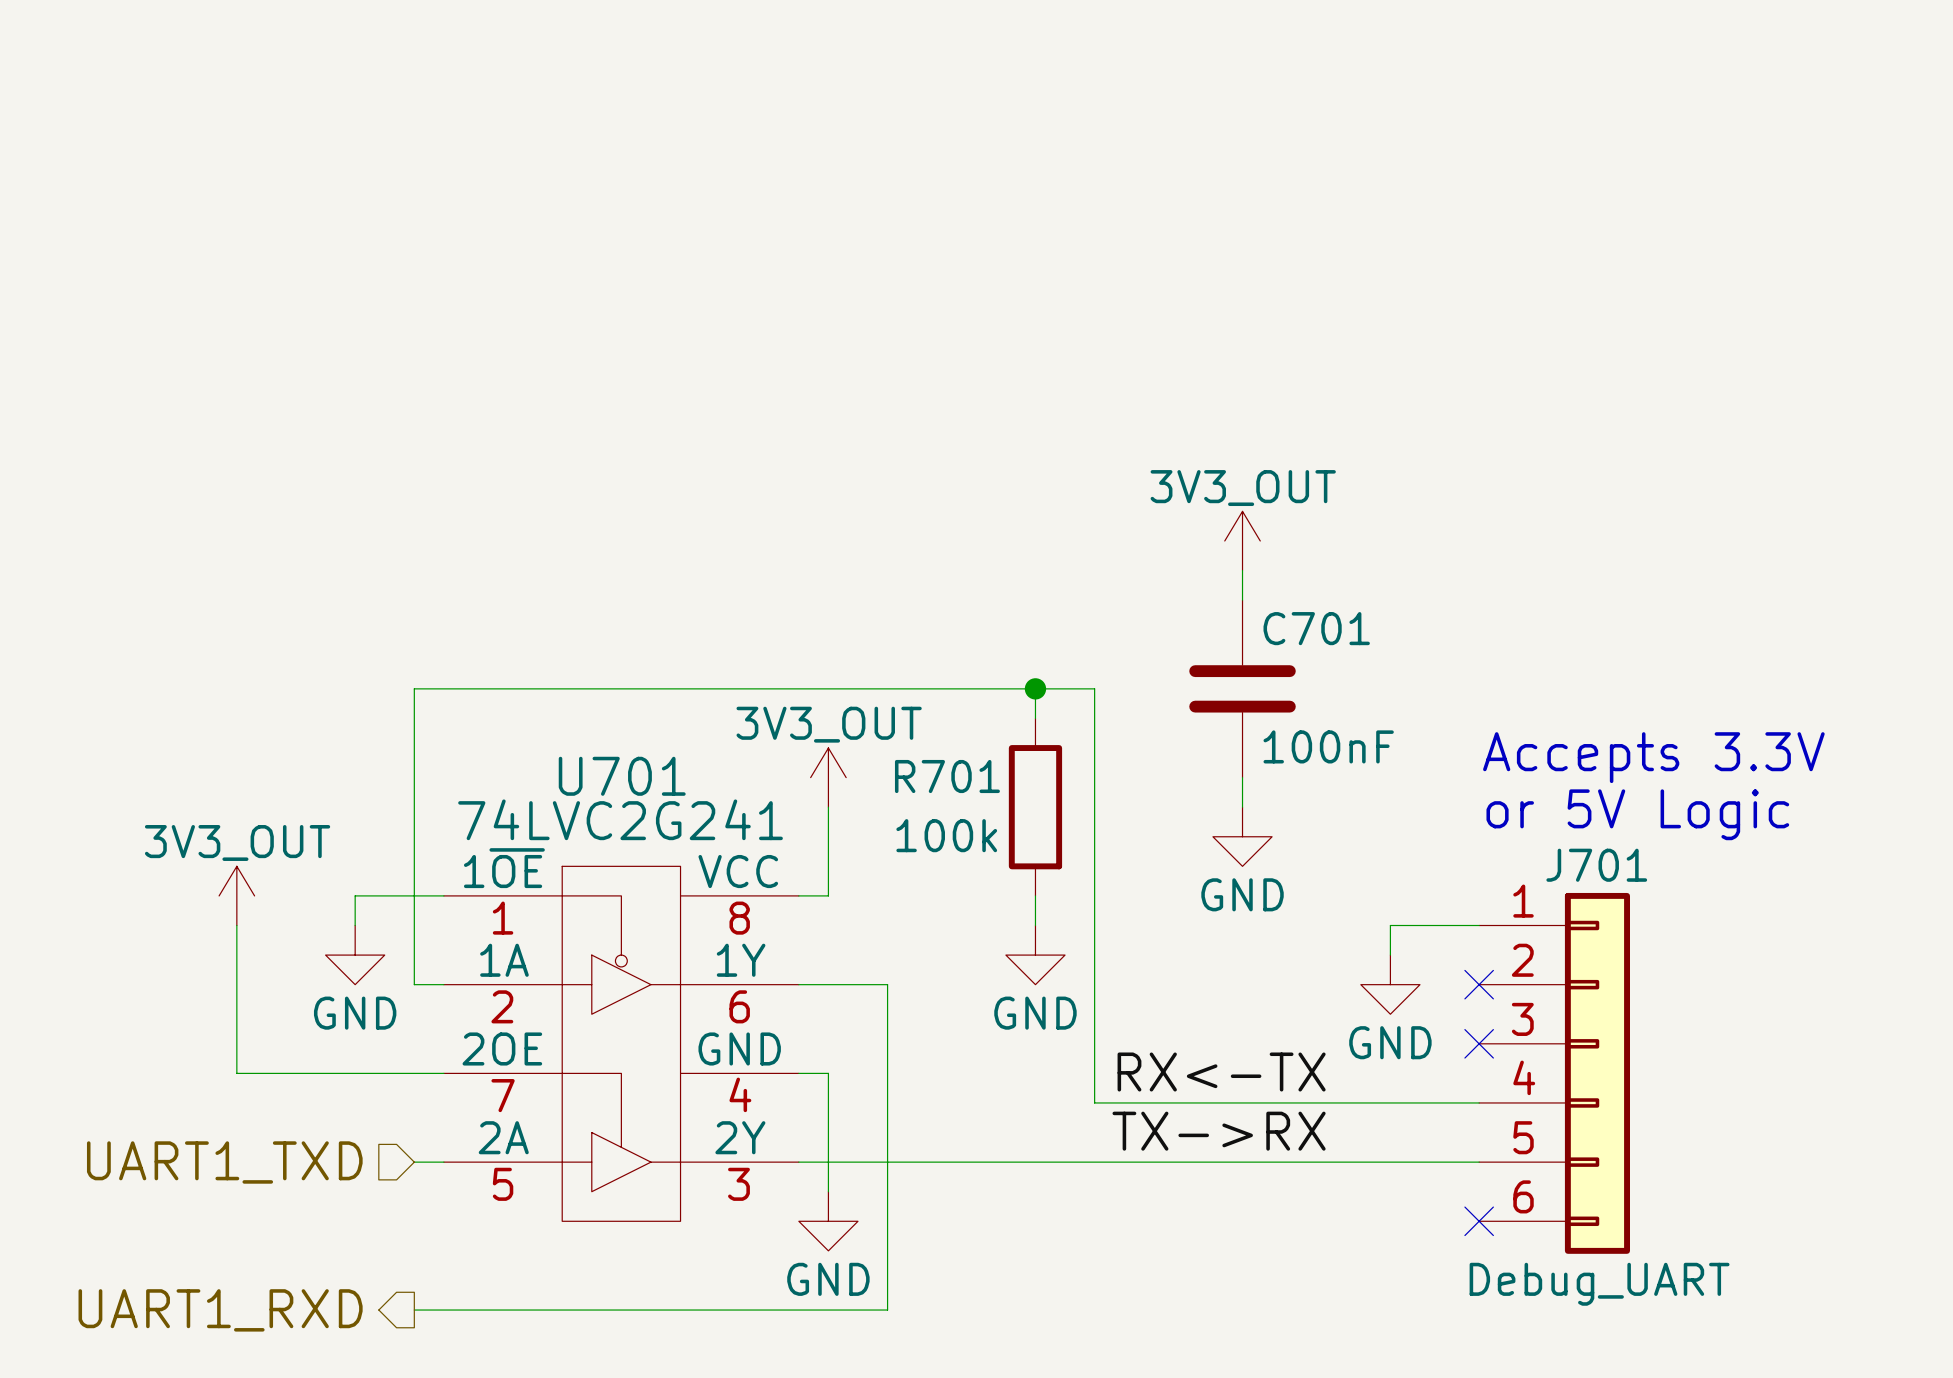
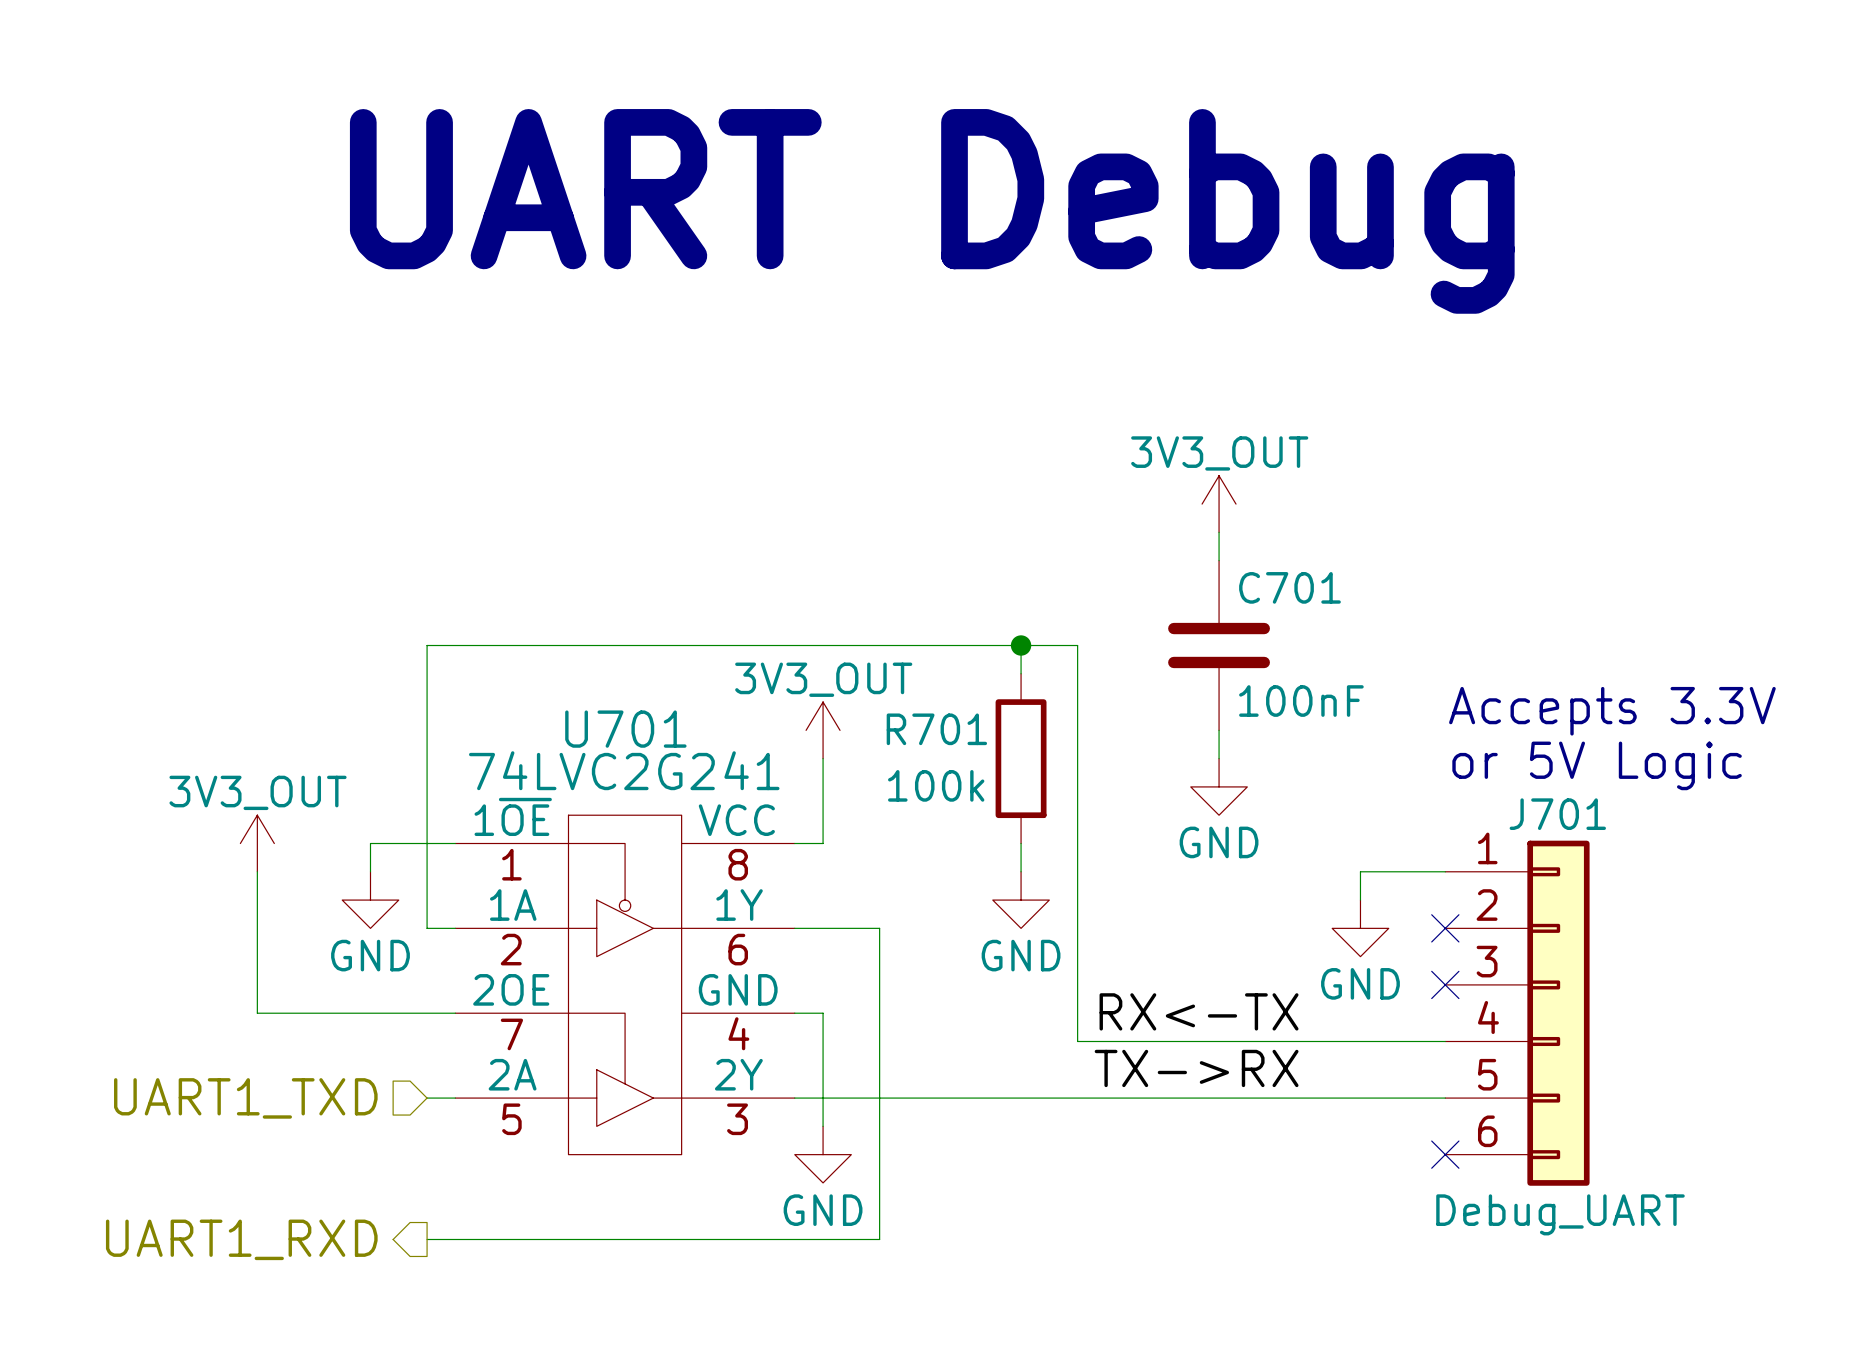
text: none -> UART Debug (932, 211)

